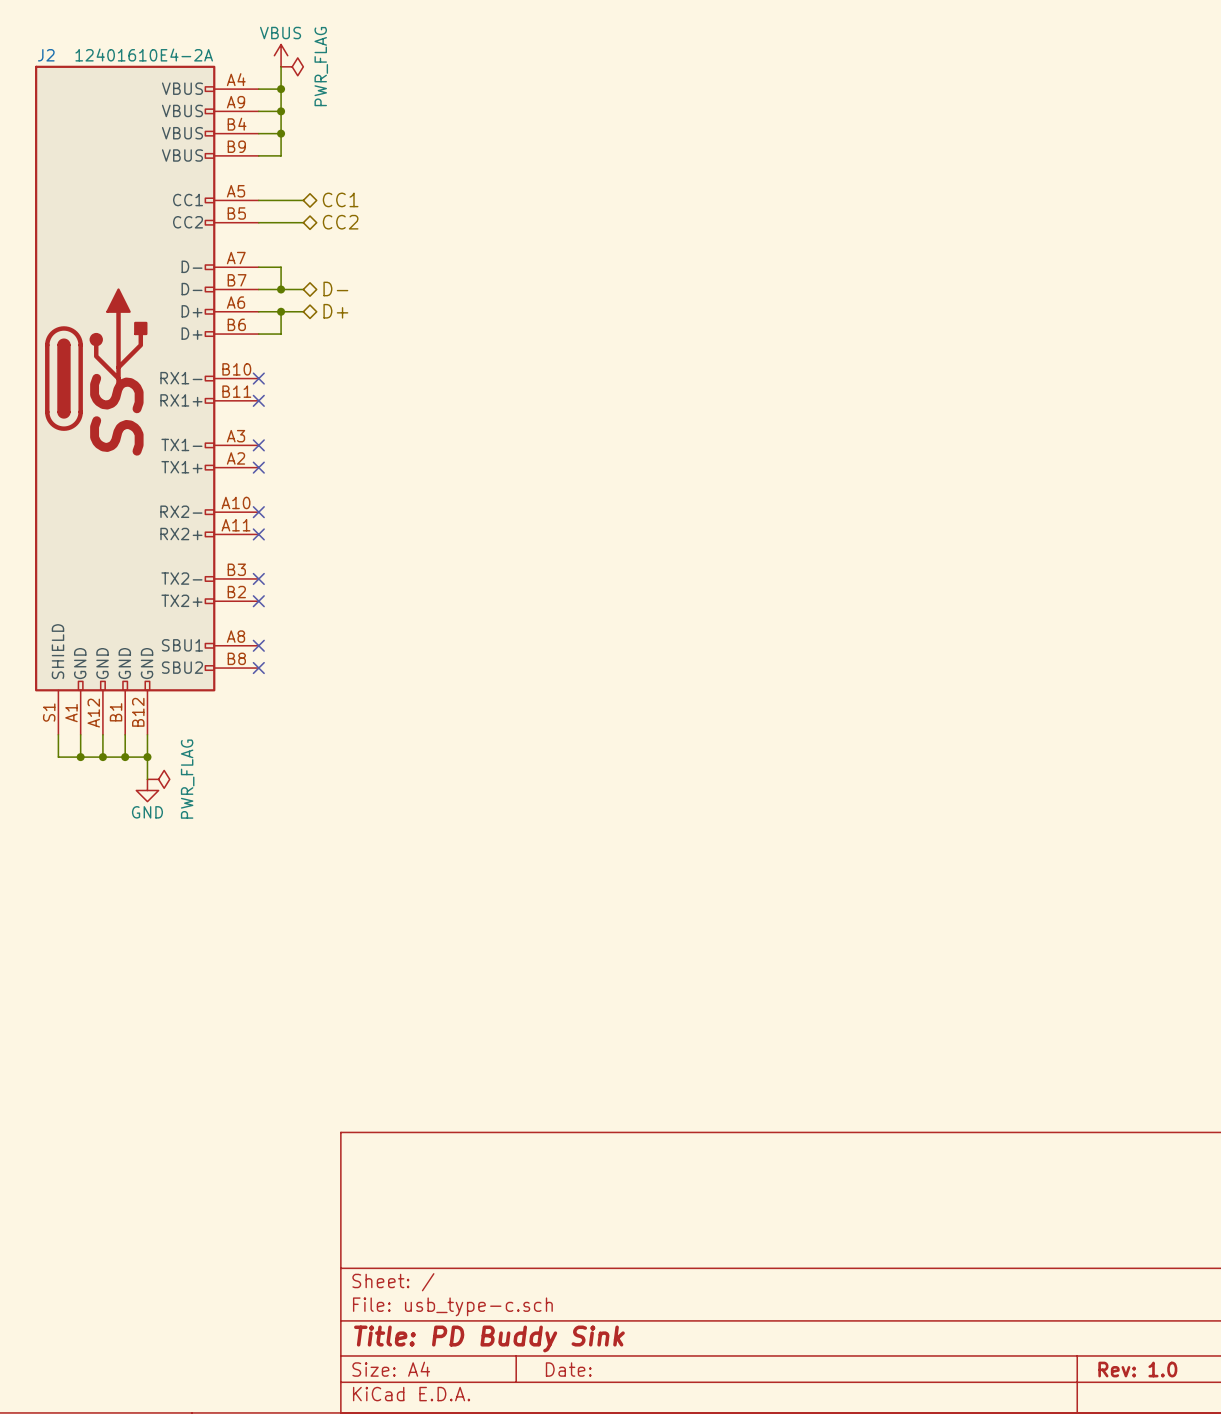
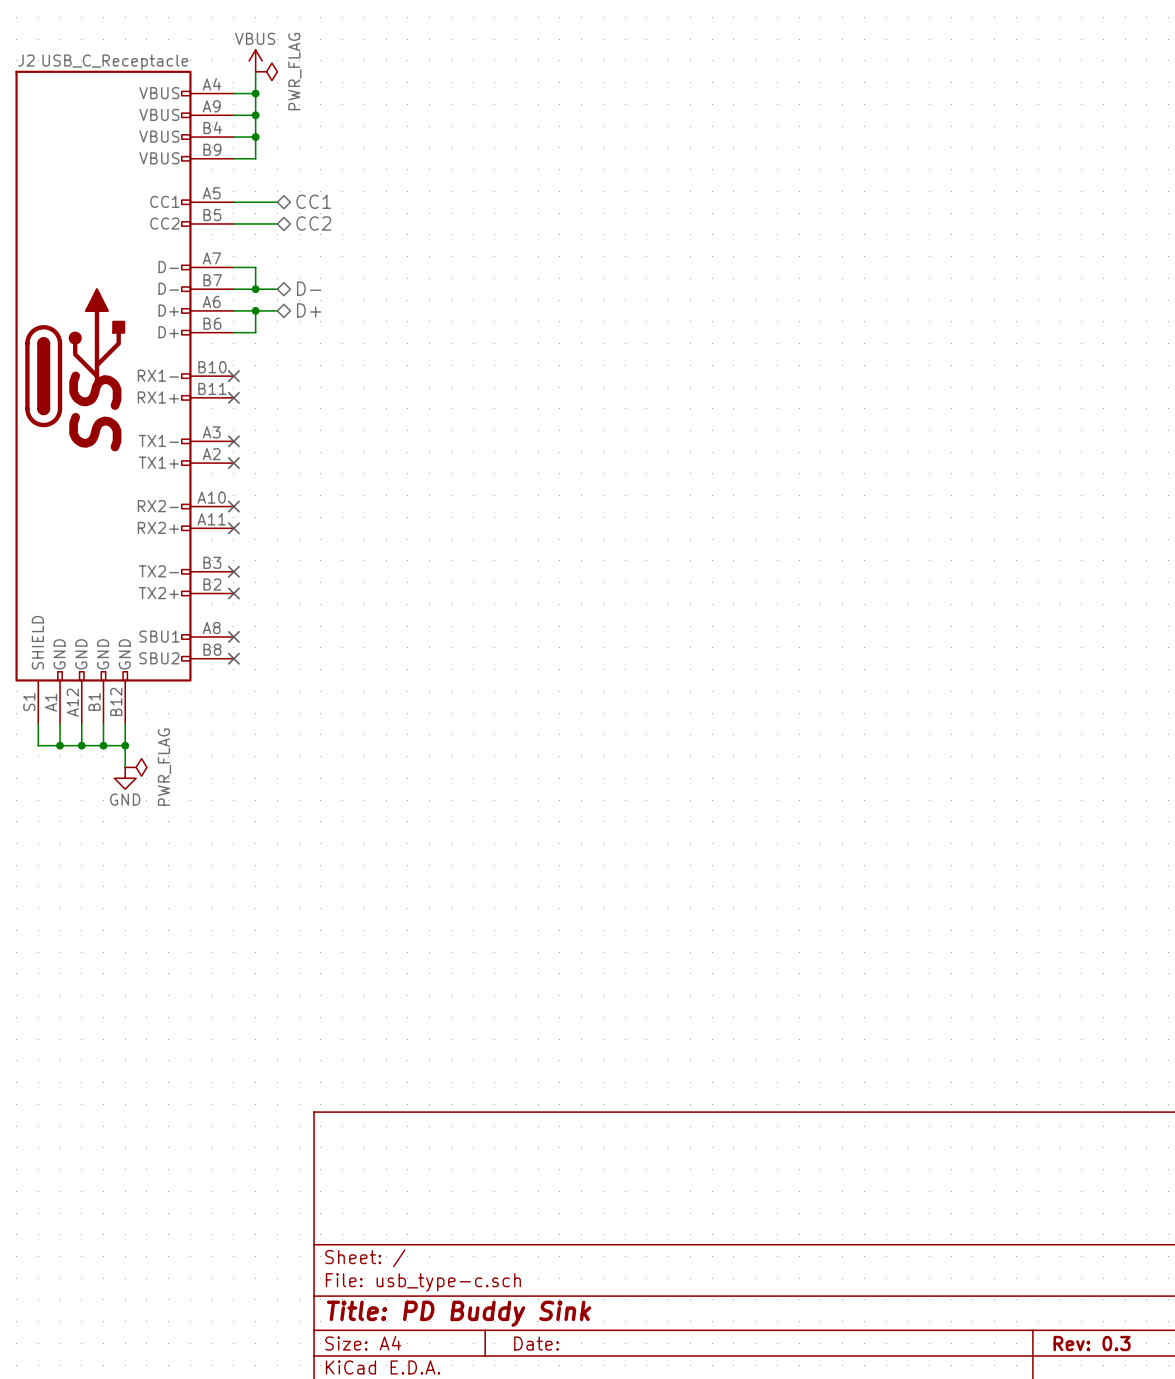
J2 value: 12401610E4-2A (144, 55) -> USB_C_Receptacle (115, 62)
title block: Rev: 1.0 (1137, 1369) -> Rev: 0.3 (1092, 1343)

